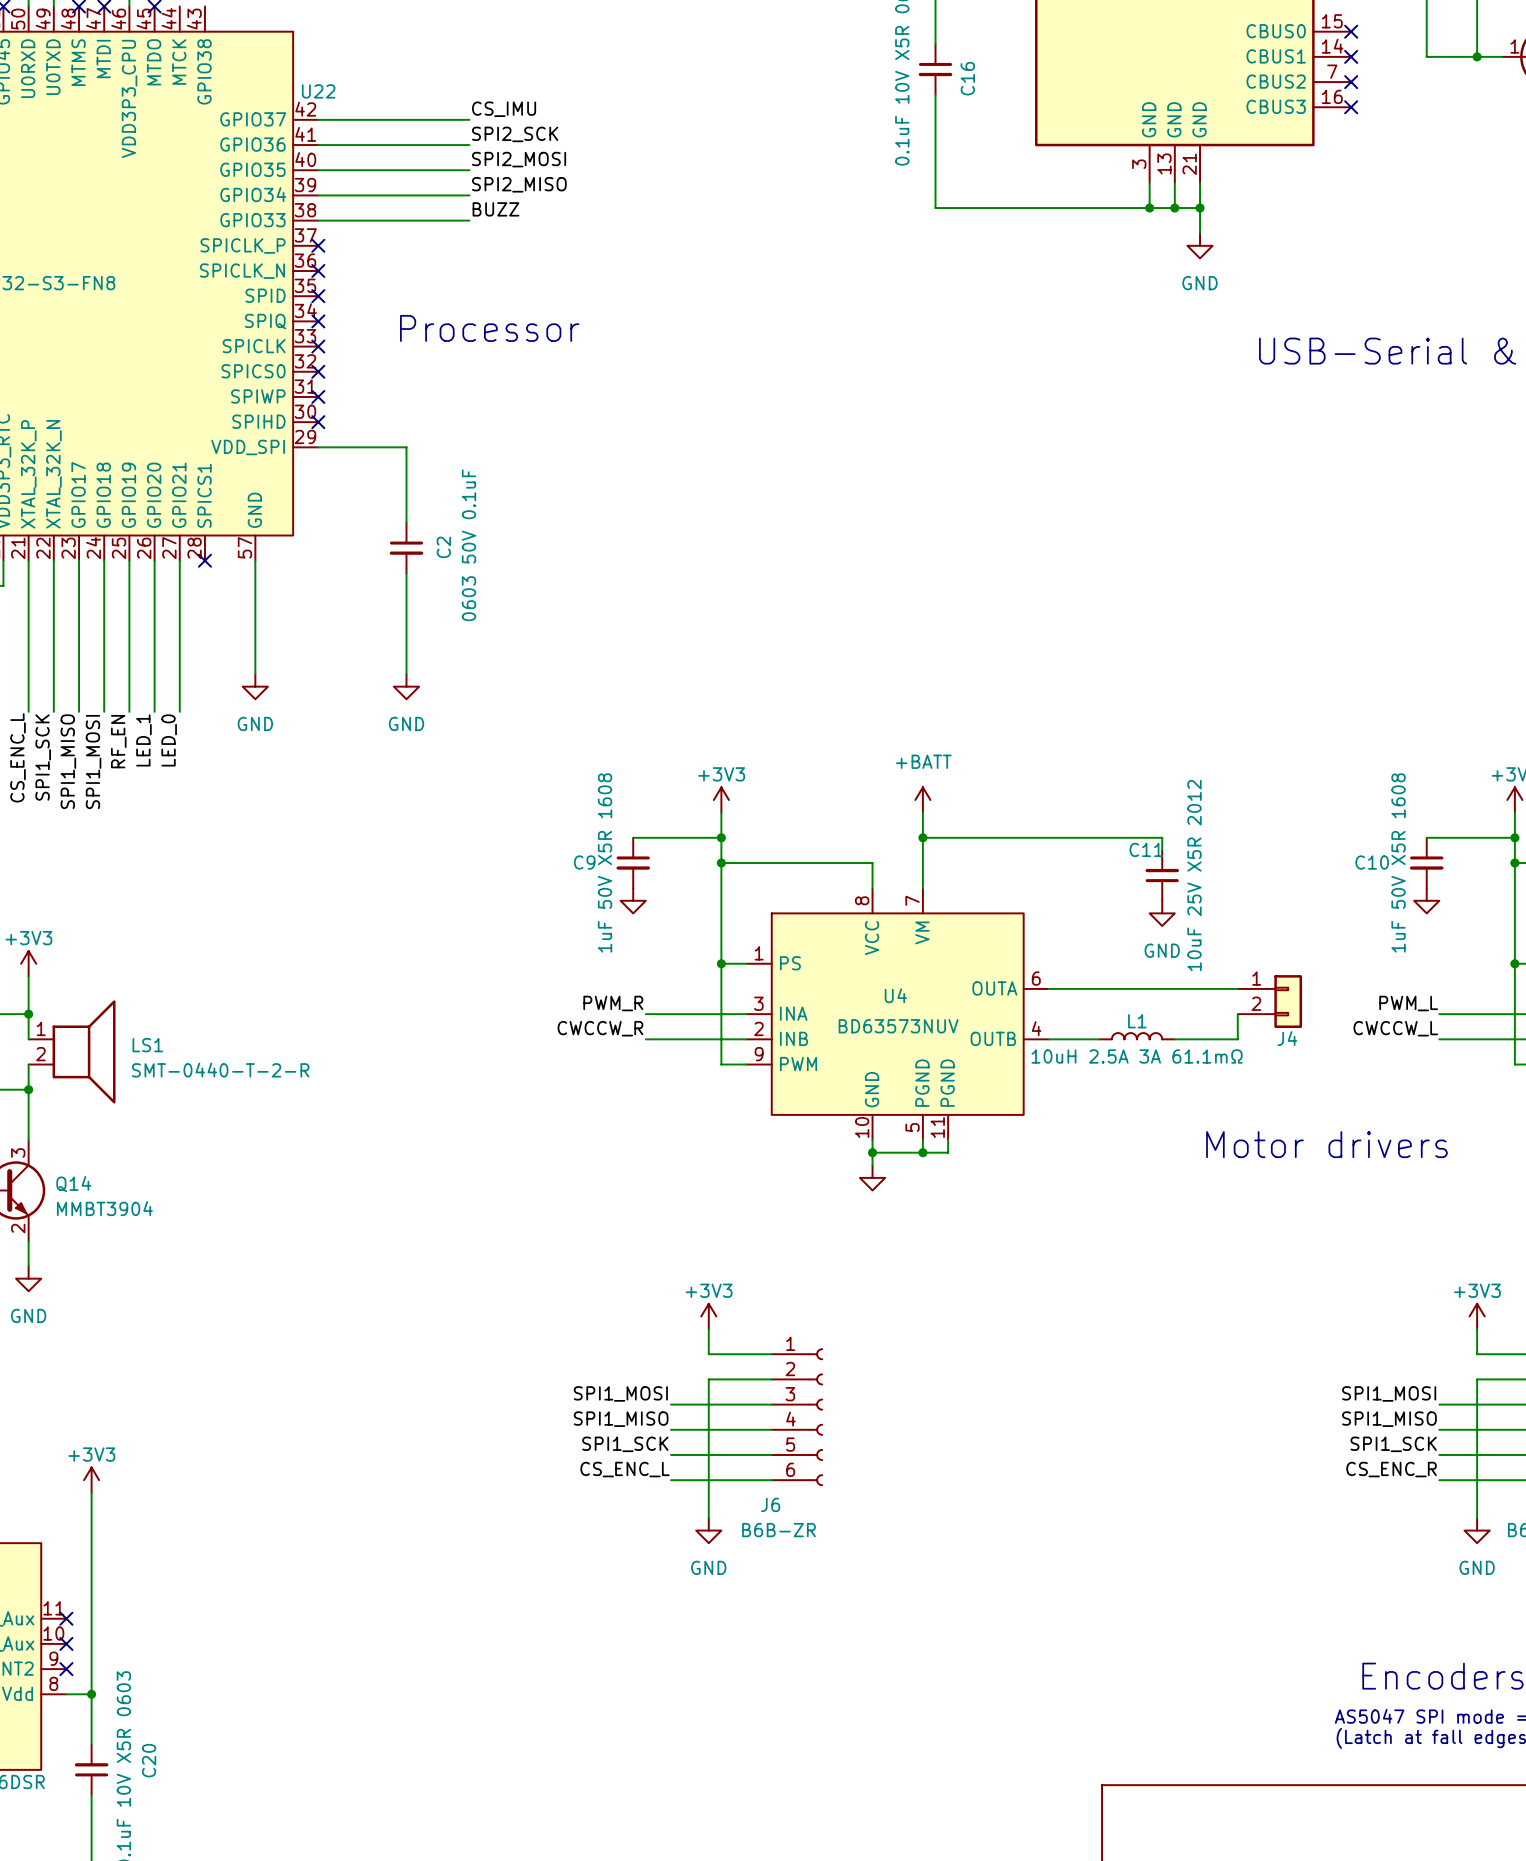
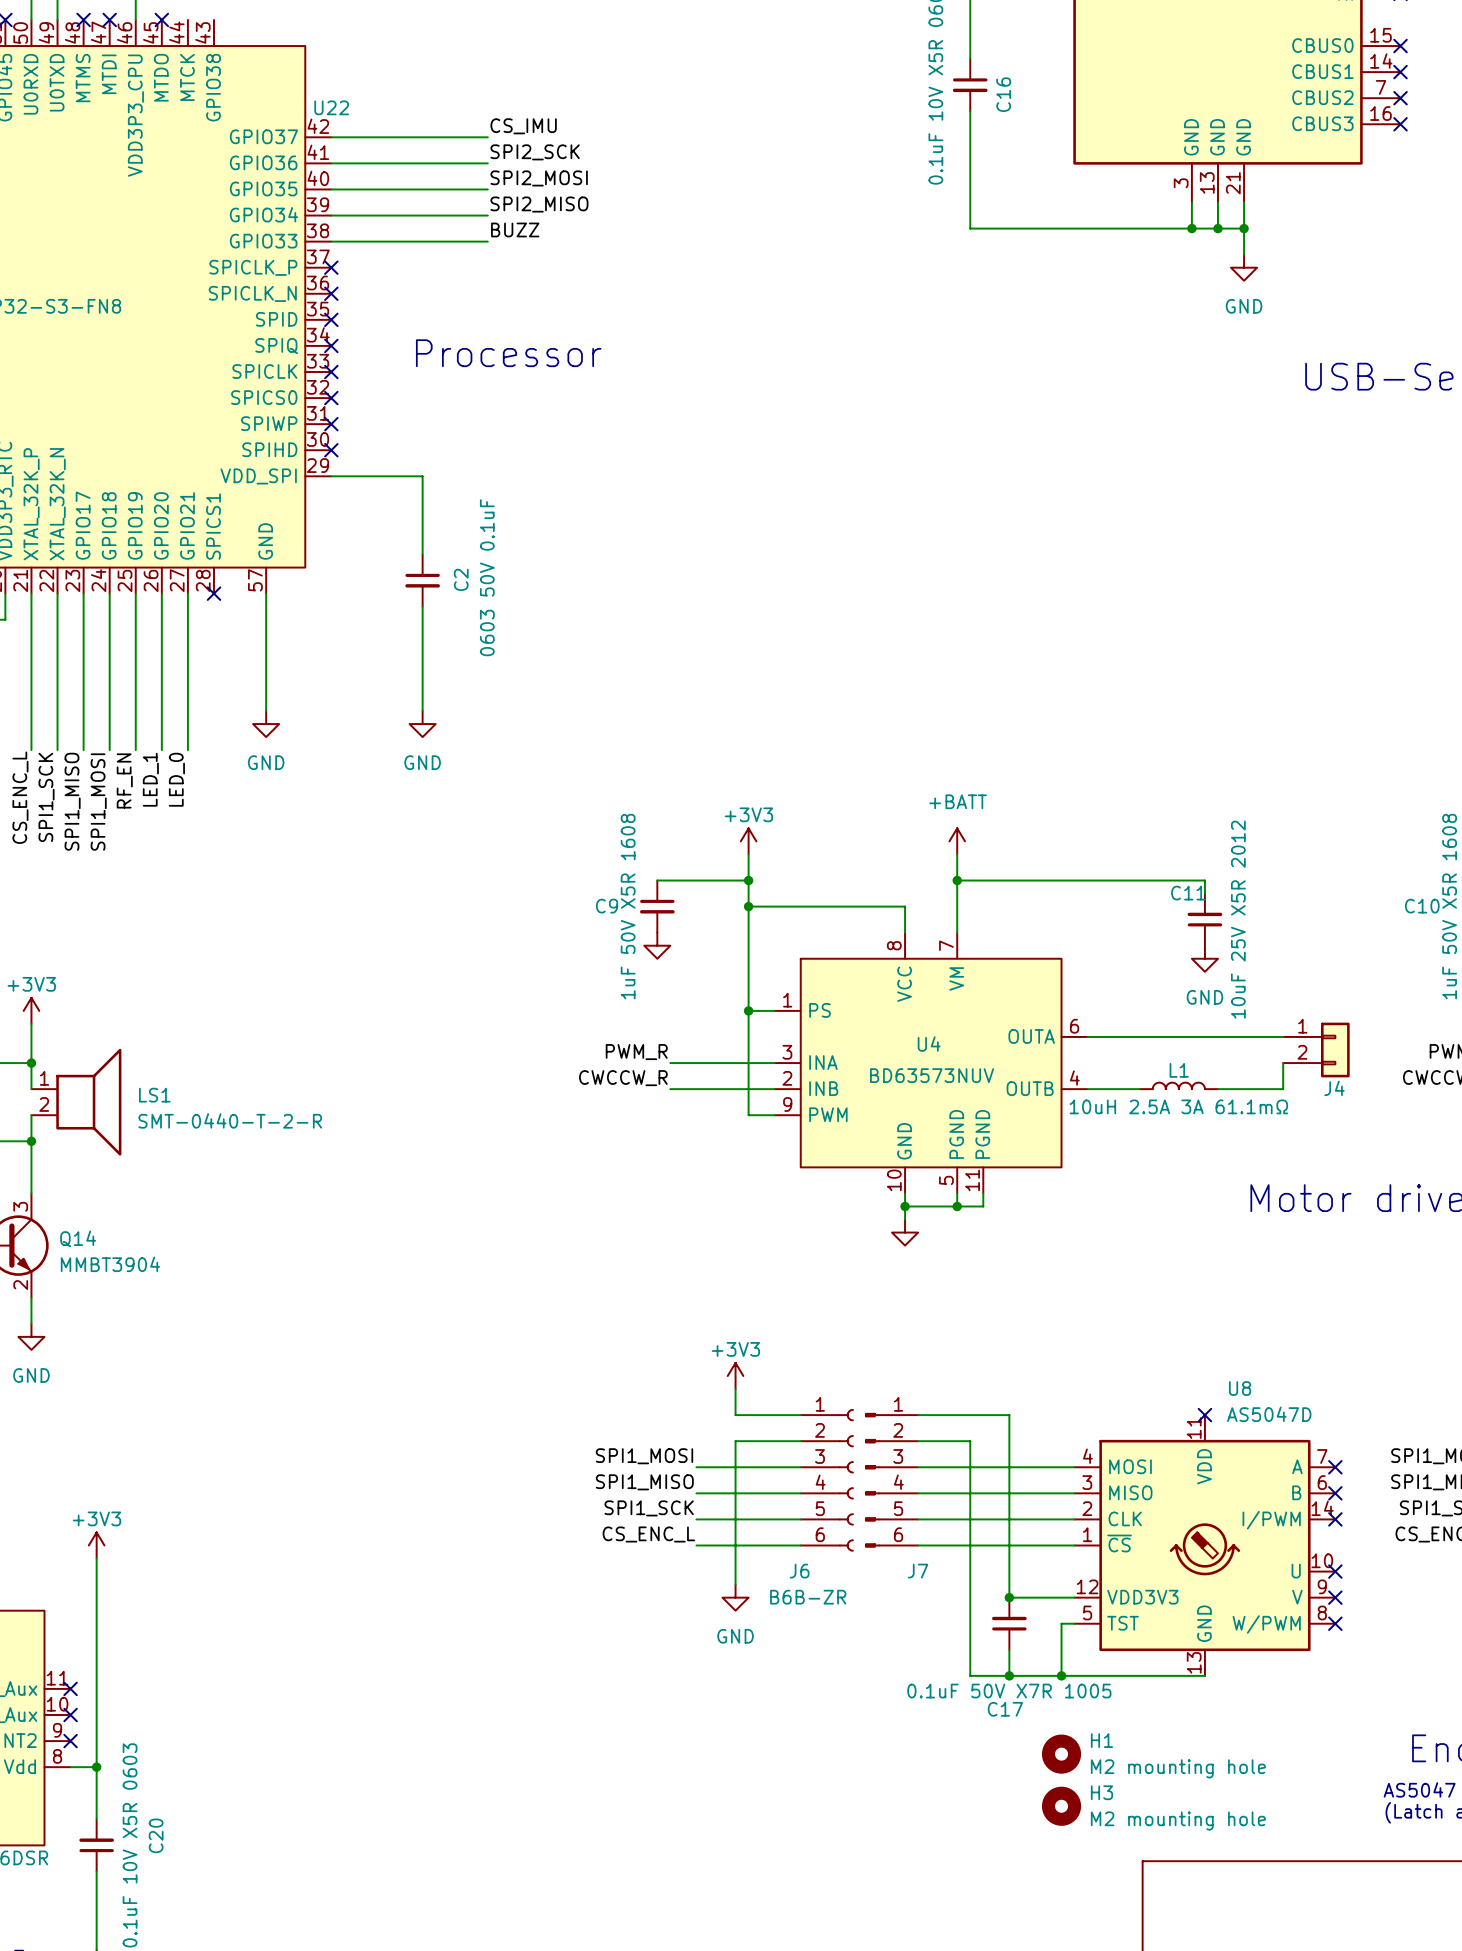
wire: none -> (918, 1415) (1009, 1415) (1009, 1597) (1074, 1597)
no-connect mark: none -> (1204, 1415)
wire: none -> (918, 1441) (970, 1441) (970, 1675) (1204, 1675)
wire: none -> (918, 1467) (1074, 1467)
no-connect mark: none -> (1335, 1467)
J7: none -> (891, 1480)
wire: none -> (918, 1493) (1074, 1493)
no-connect mark: none -> (1335, 1493)
wire: none -> (918, 1519) (1074, 1519)
no-connect mark: none -> (1335, 1519)
wire: none -> (918, 1545) (1074, 1545)
U8: none -> AS5047D (1204, 1545)
no-connect mark: none -> (1335, 1571)
junction: none -> (1009, 1597)
no-connect mark: none -> (1335, 1597)
C17: none -> (1009, 1623)
wire: none -> (1074, 1623) (1061, 1623) (1061, 1675)
no-connect mark: none -> (1335, 1623)
wire: none -> (1009, 1649) (1009, 1675)
junction: none -> (1009, 1675)
junction: none -> (1061, 1675)
H1: none -> M2 mounting hole (1061, 1754)
H3: none -> M2 mounting hole (1061, 1806)

